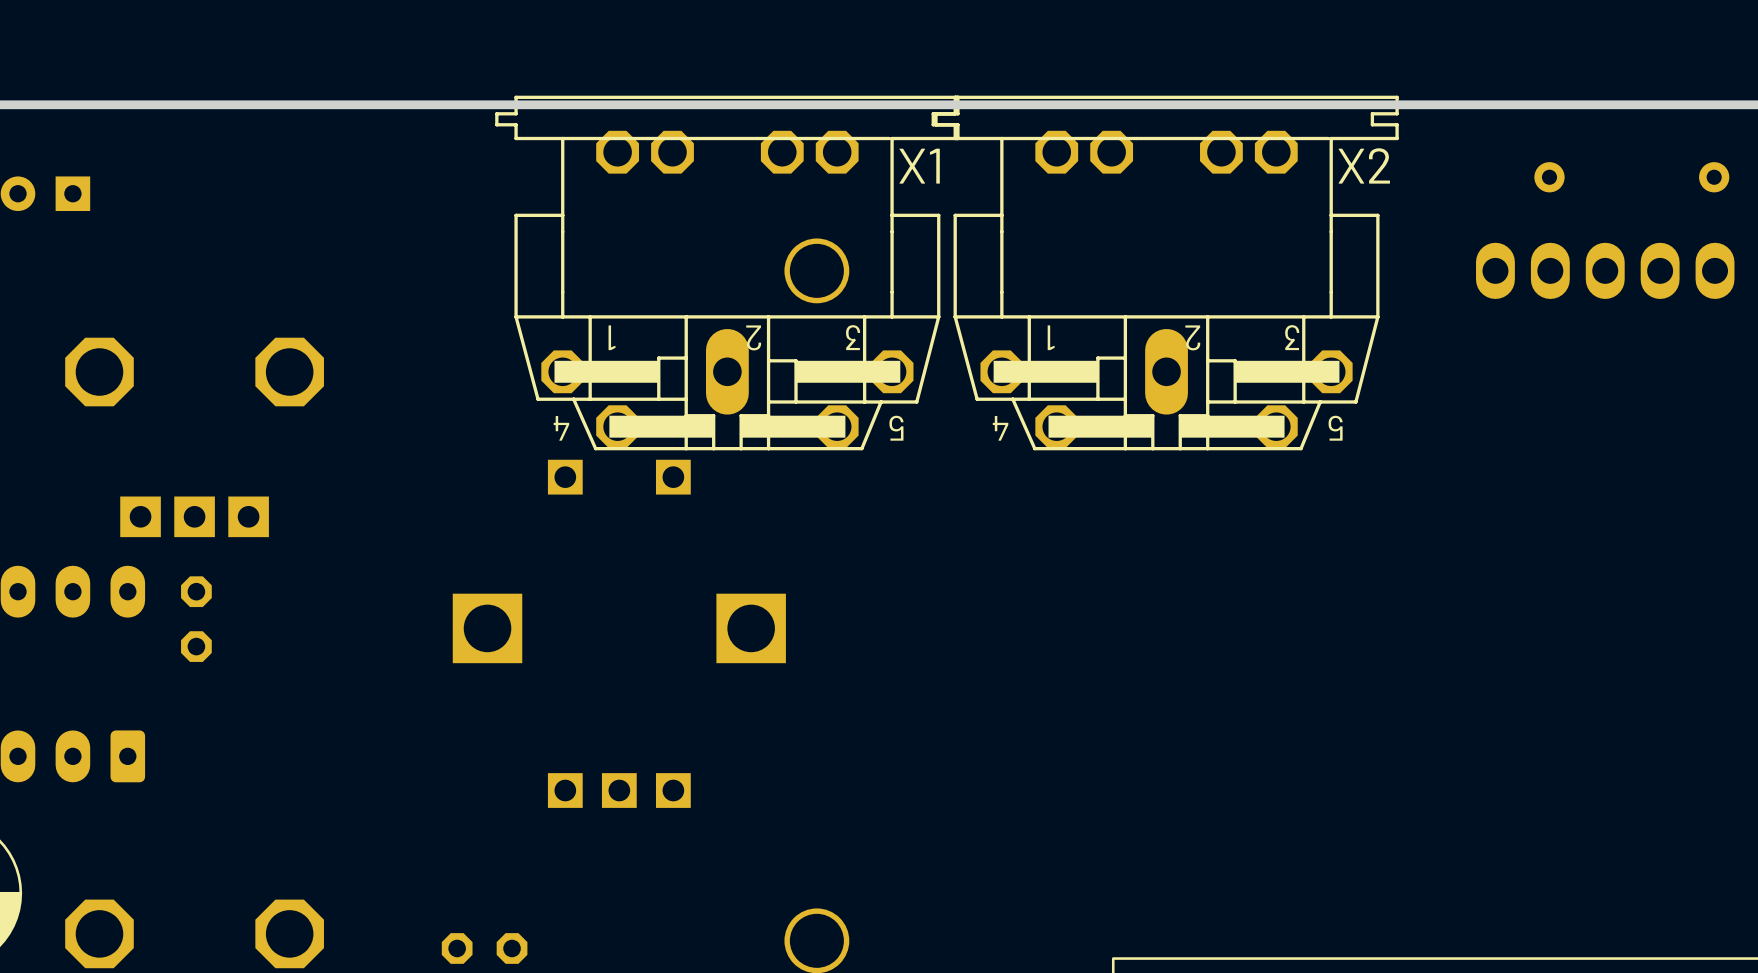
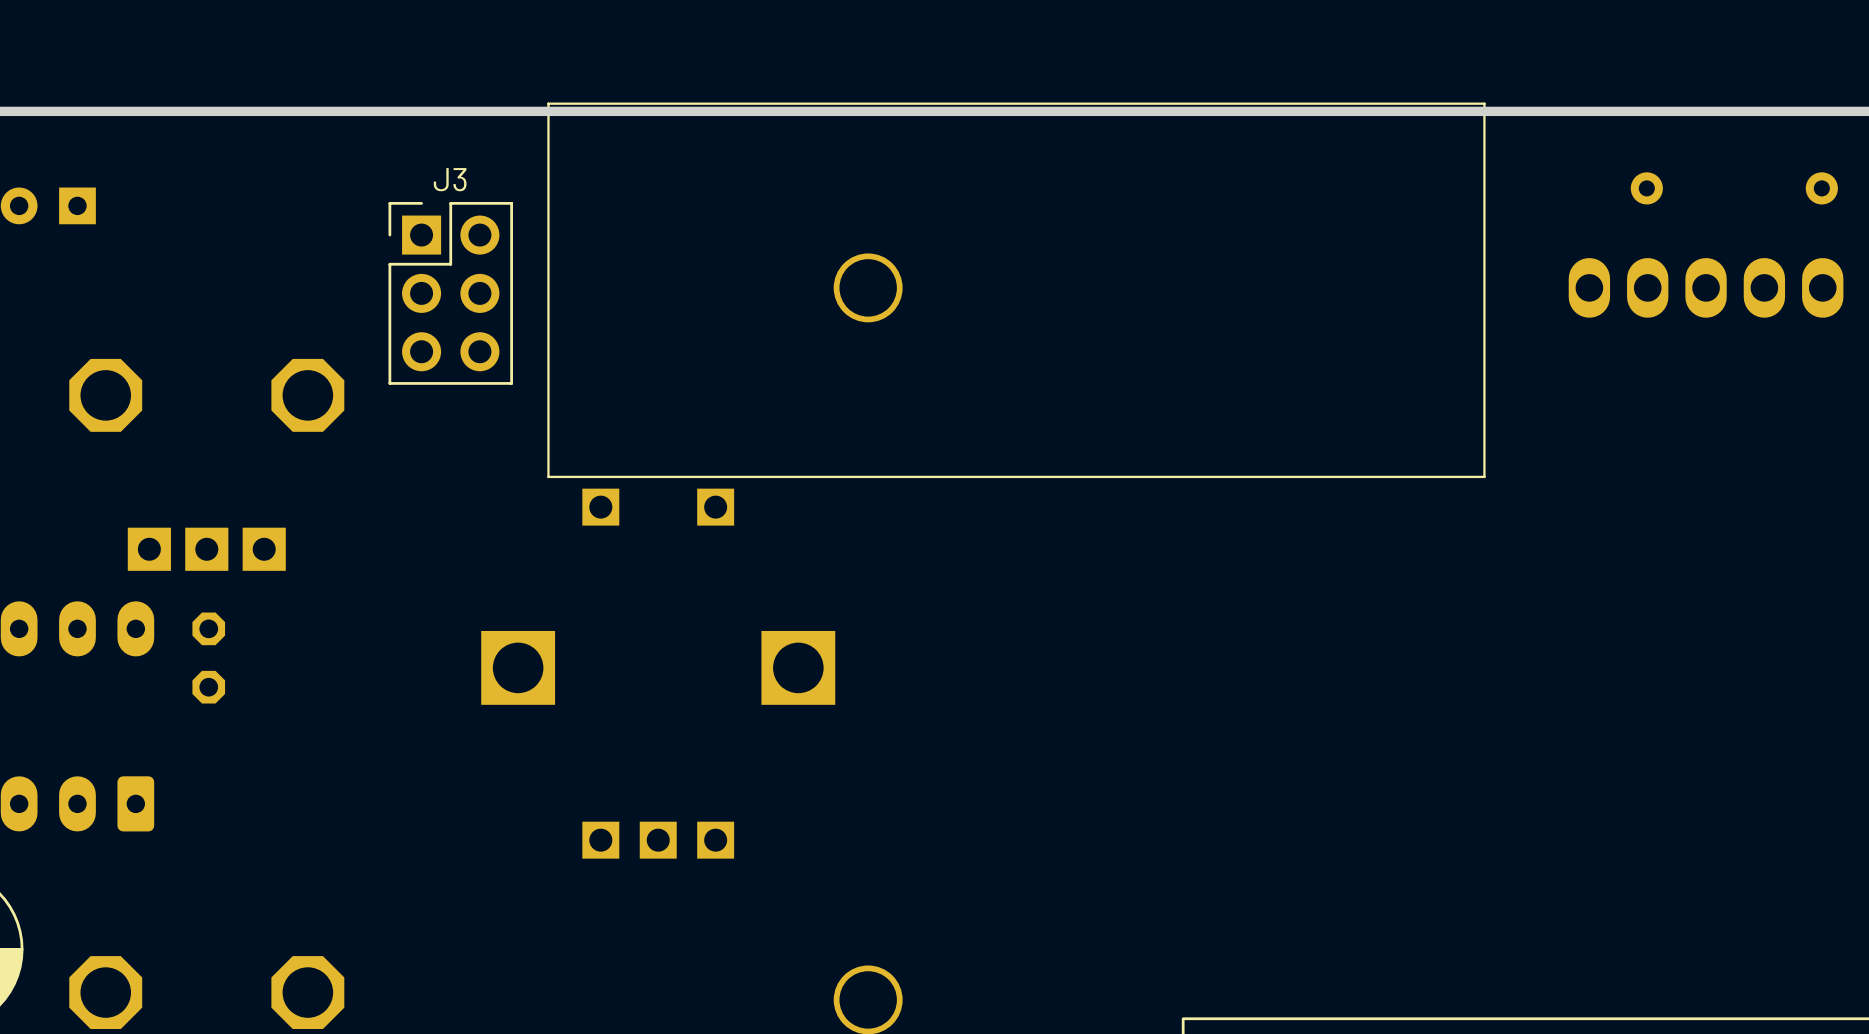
line: none -> (1484, 103) (548, 103) (548, 476) (1484, 476) (1484, 103)
X1: (727, 272) -> none
X2: (1166, 272) -> none
J3: none -> (450, 293)
part: (484, 948) -> none

